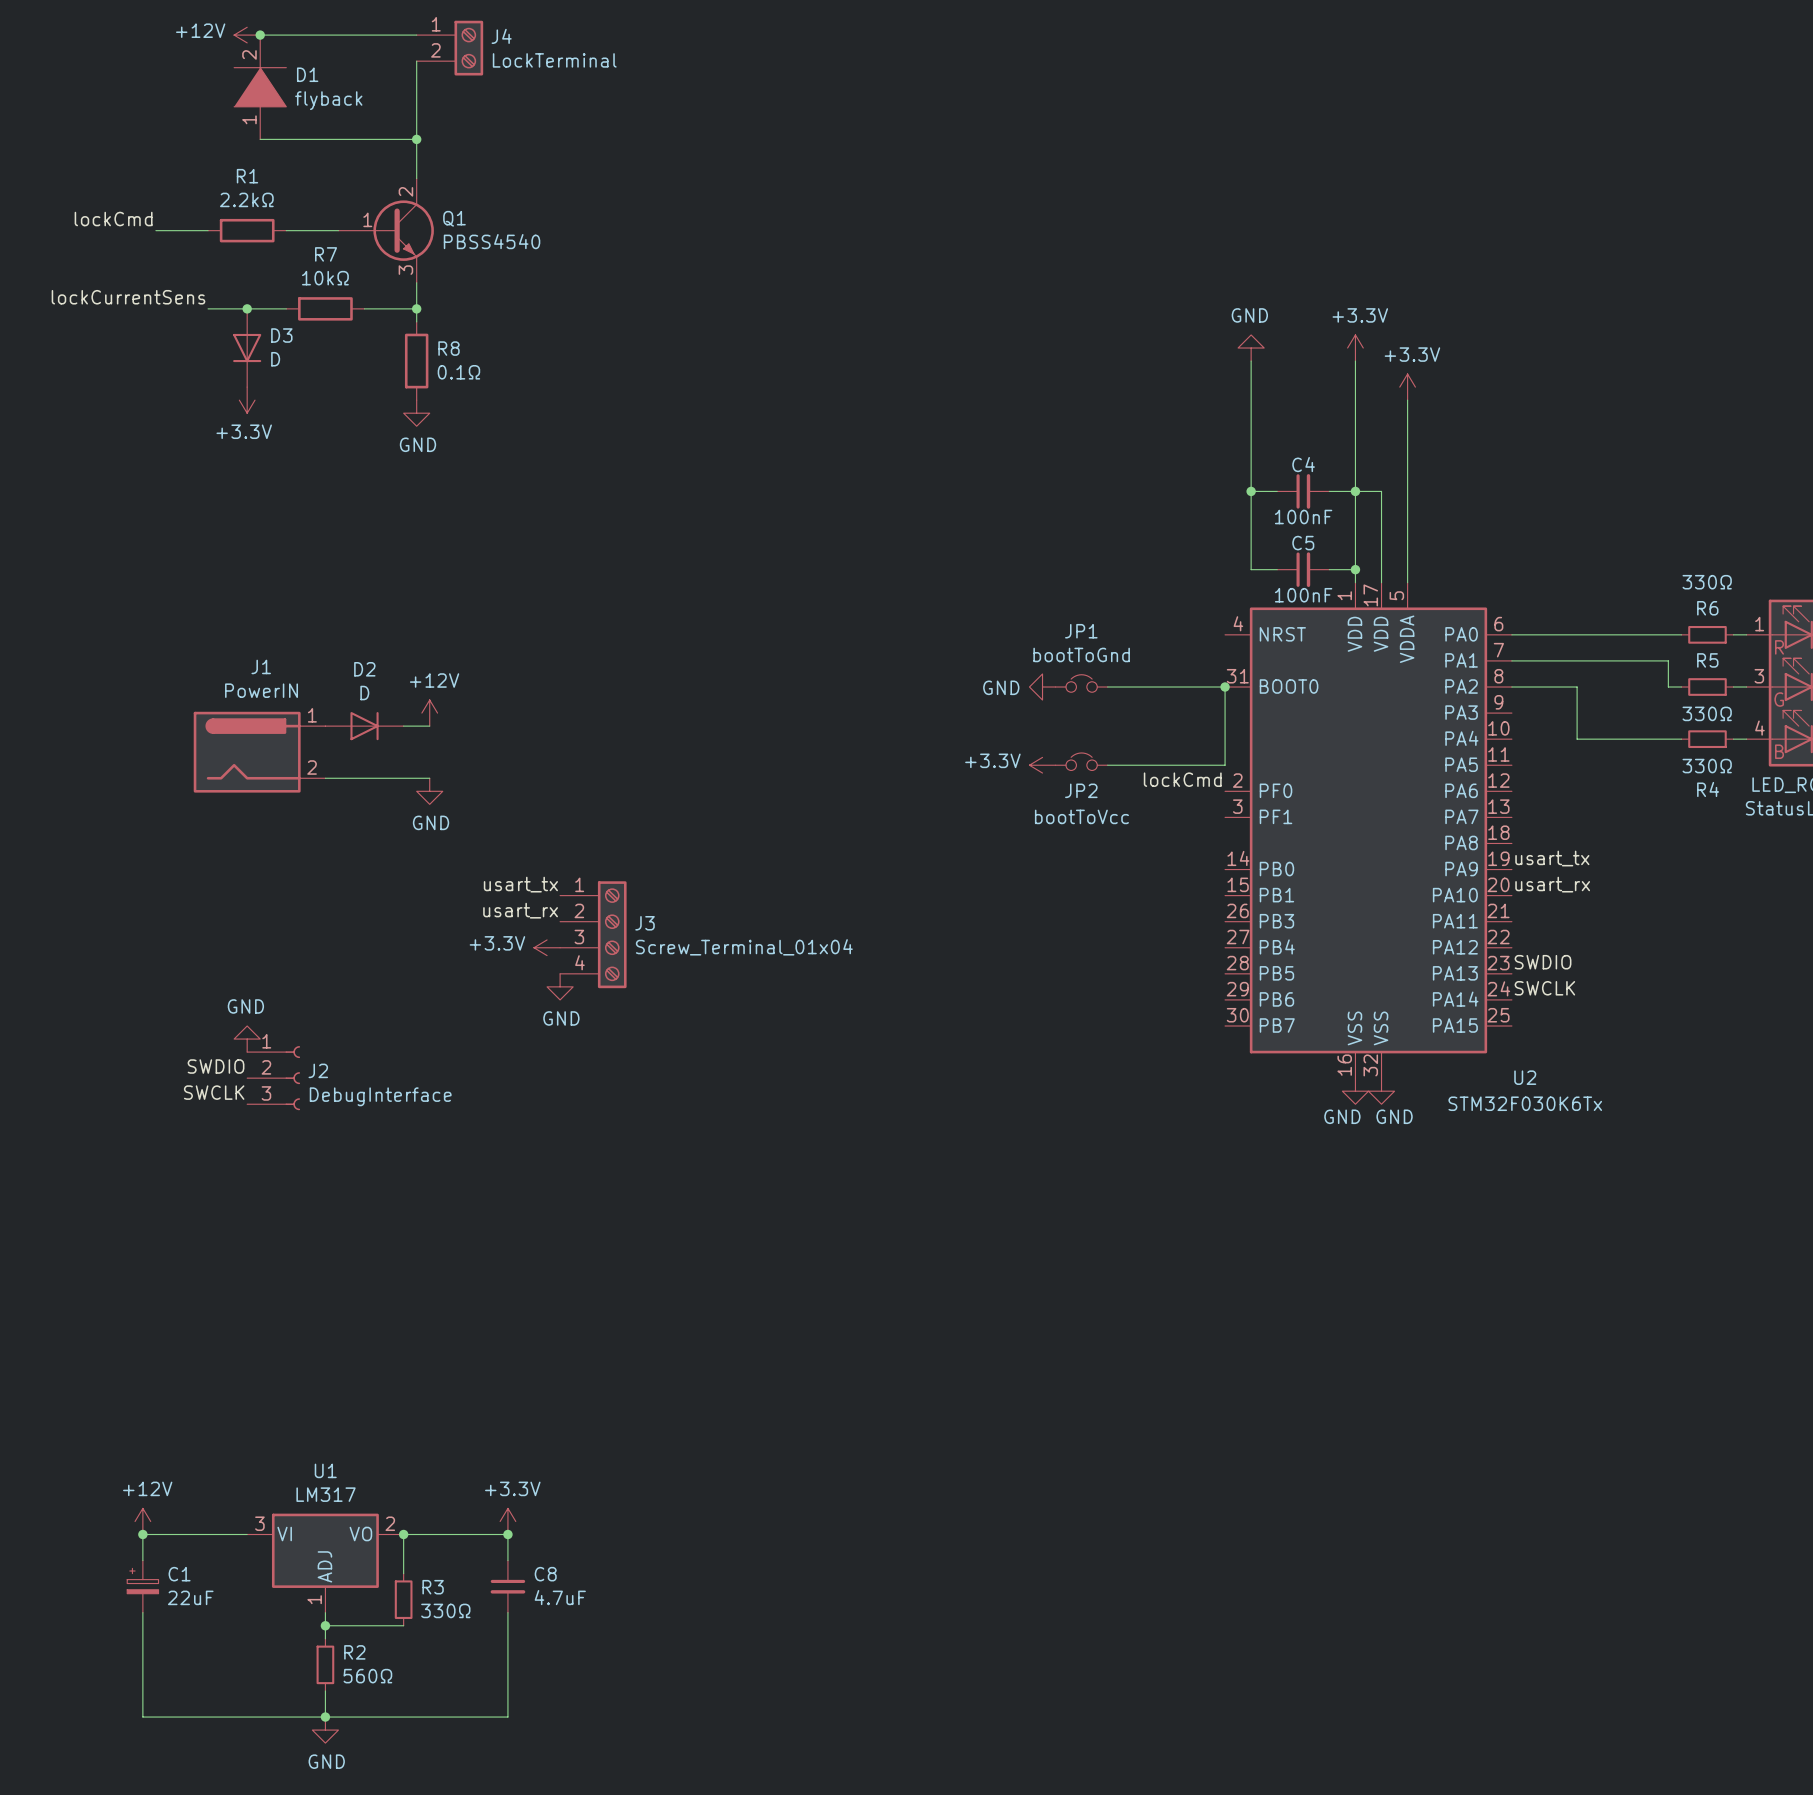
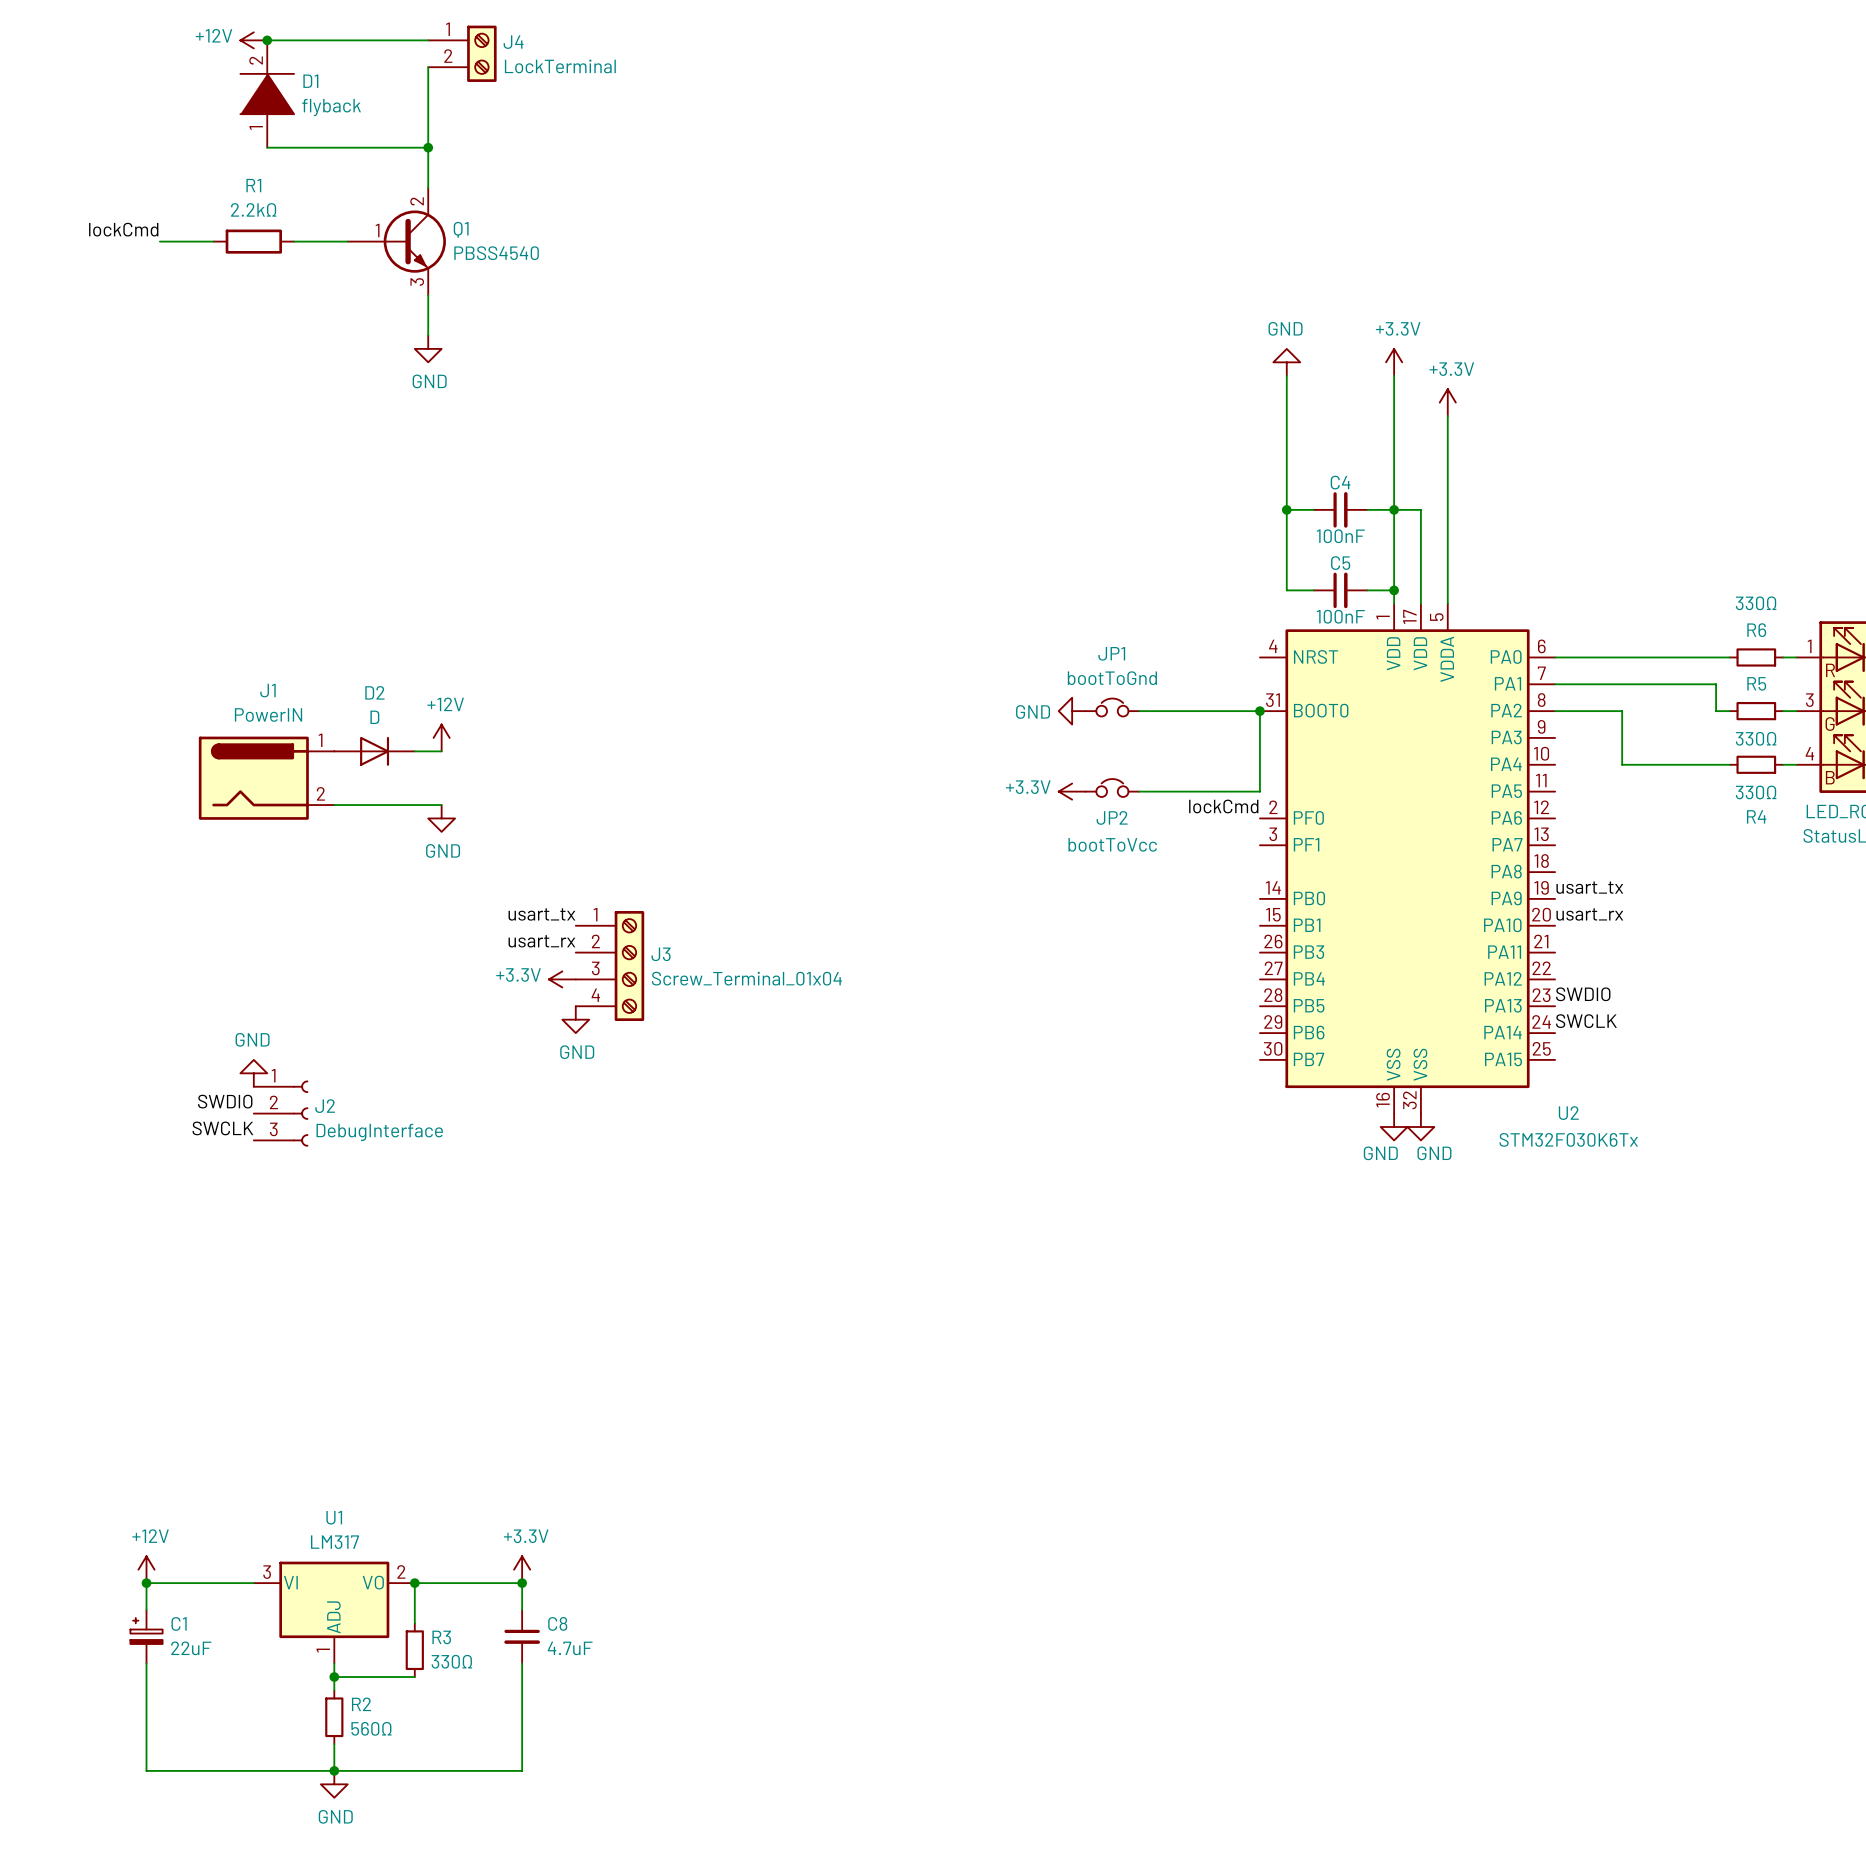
label: lockCurrentSens (128, 297) -> none
wire: (208, 308) (286, 308) -> none
junction: (247, 308) -> none
R7: 10kΩ (325, 308) -> none
wire: (364, 308) (416, 308) -> none
junction: (416, 308) -> none
D3: D (247, 348) -> none
R8: 0.1Ω (416, 361) -> none
power symbol: +3.3V (247, 400) -> none
power symbol position: GND (416, 413) -> GND (428, 348)

